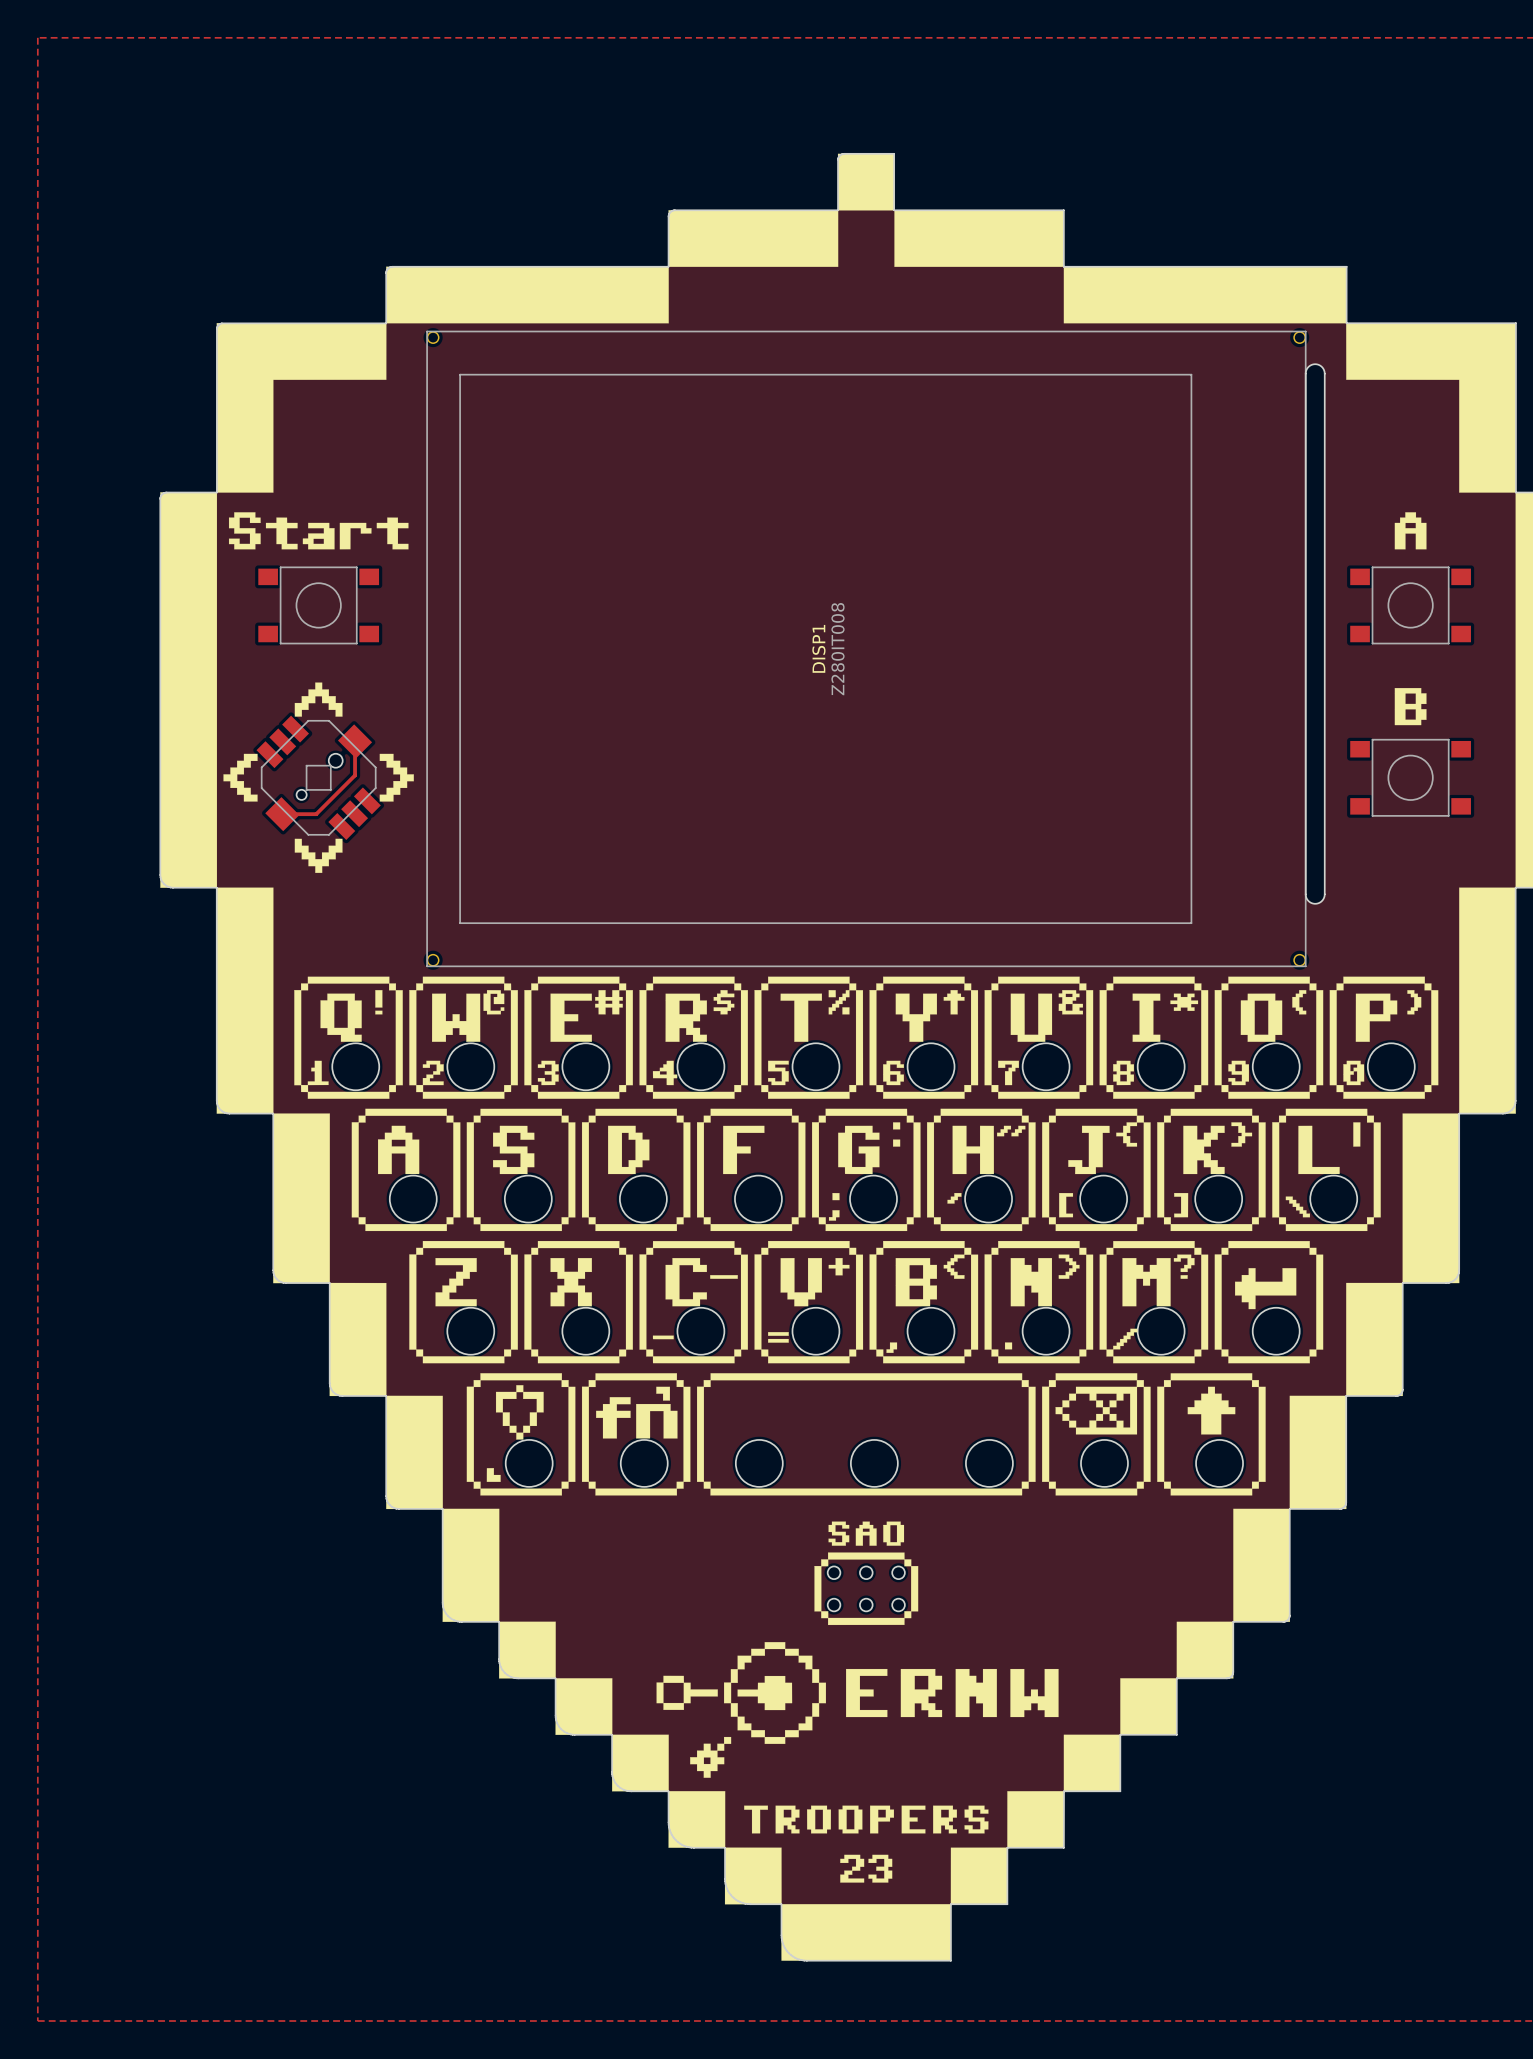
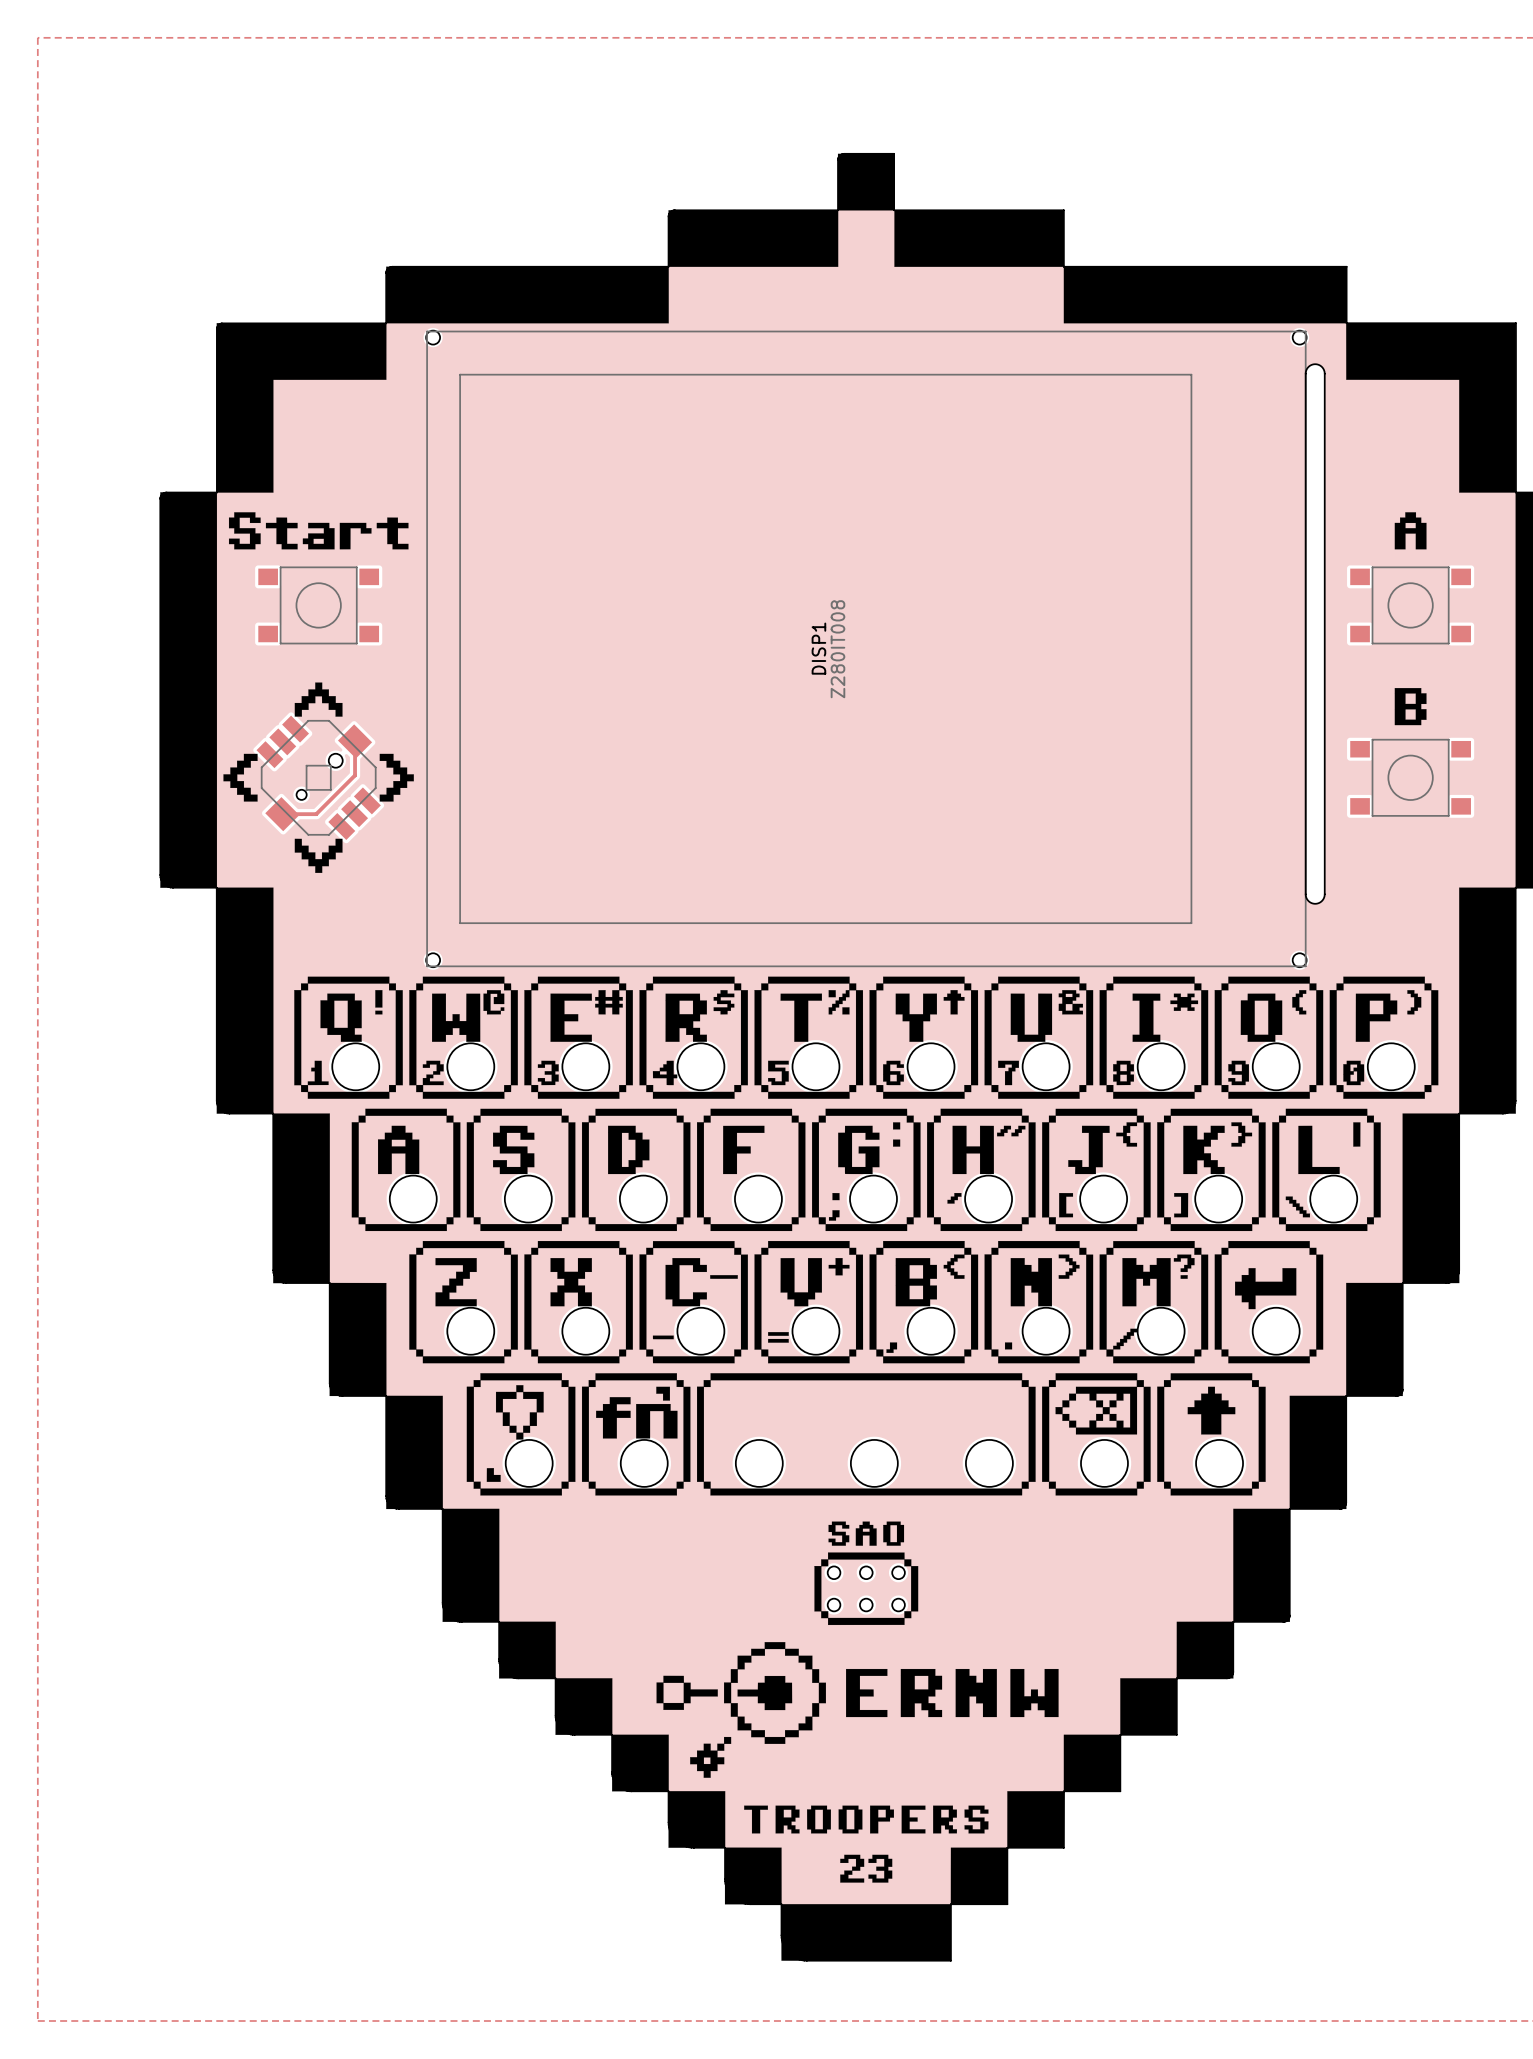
DISP1 footprint: [426, 330, 1326, 967] -> [426, 330, 1326, 968]

